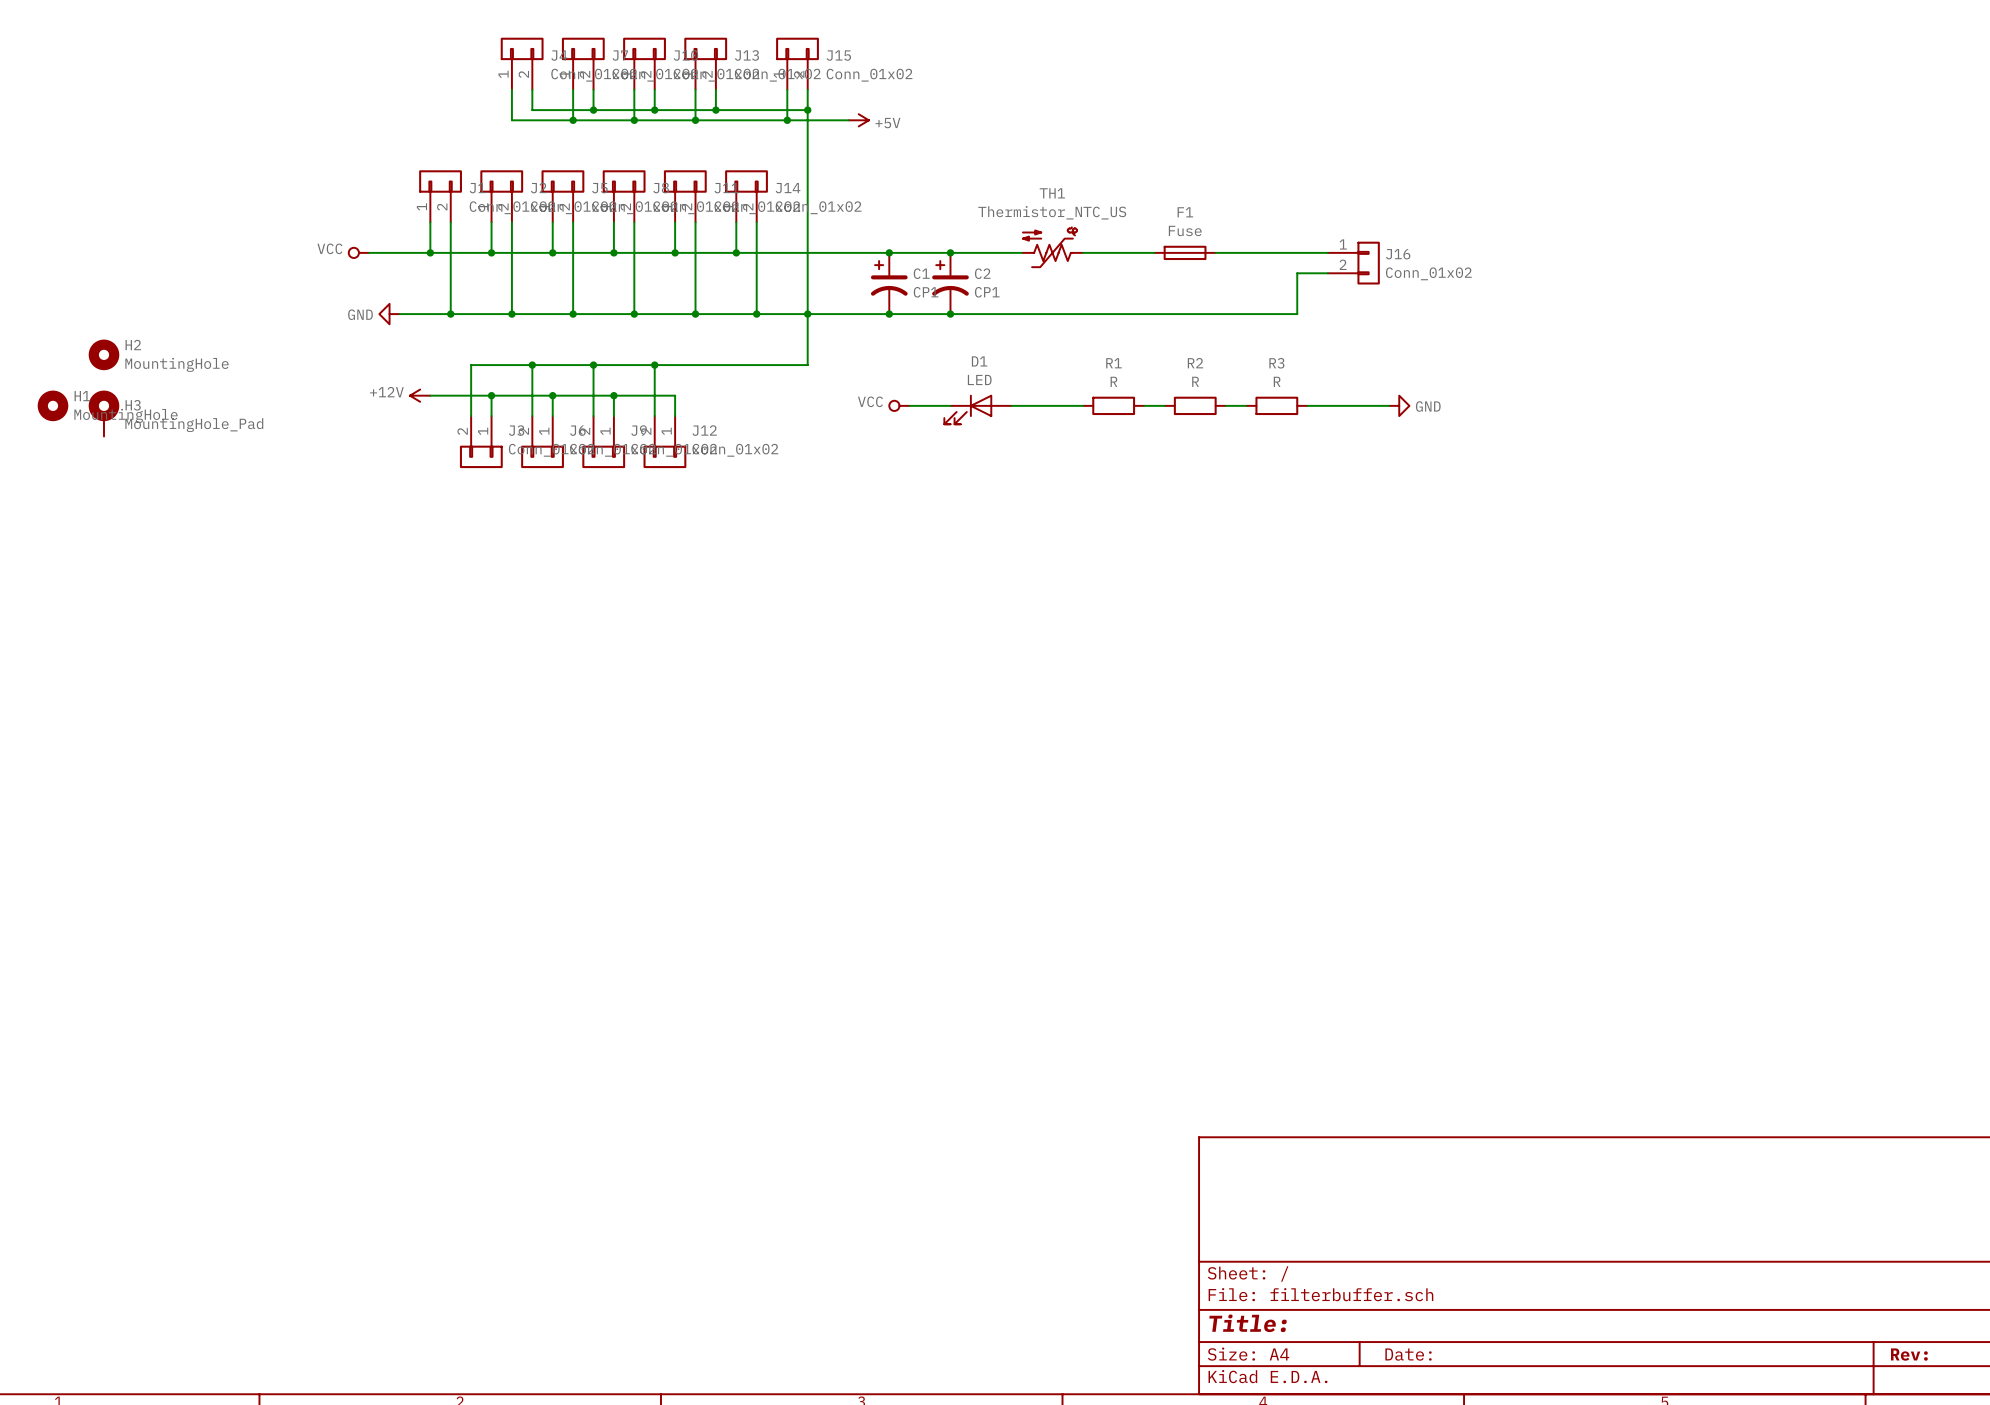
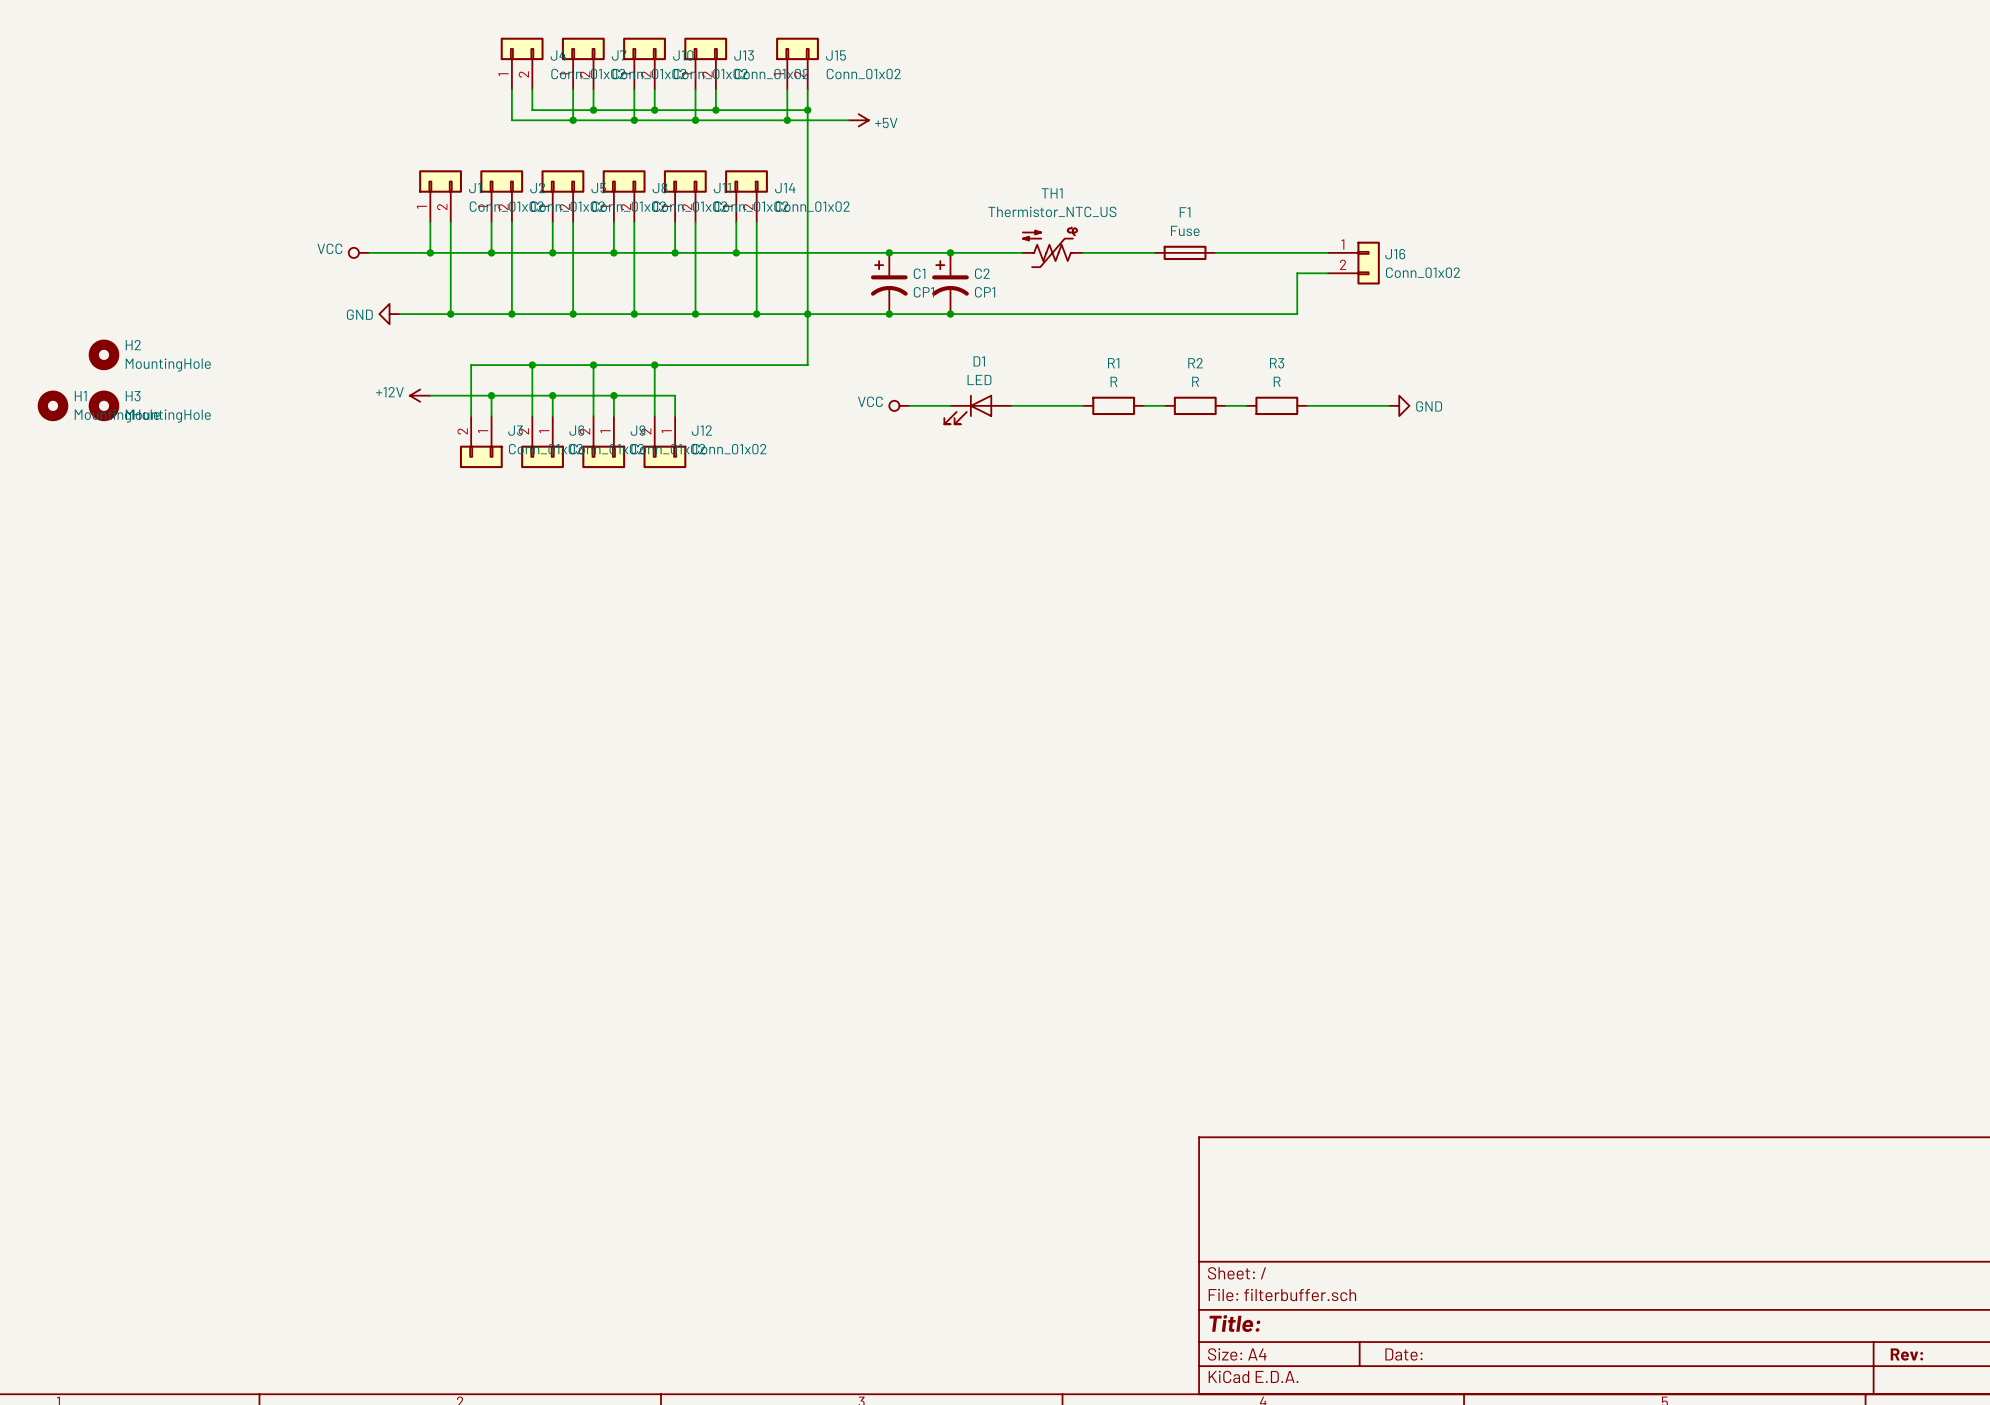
H3 symbol: [88, 390, 120, 437] -> [88, 390, 120, 422]
H3 value: MountingHole_Pad (194, 425) -> MountingHole (168, 416)

